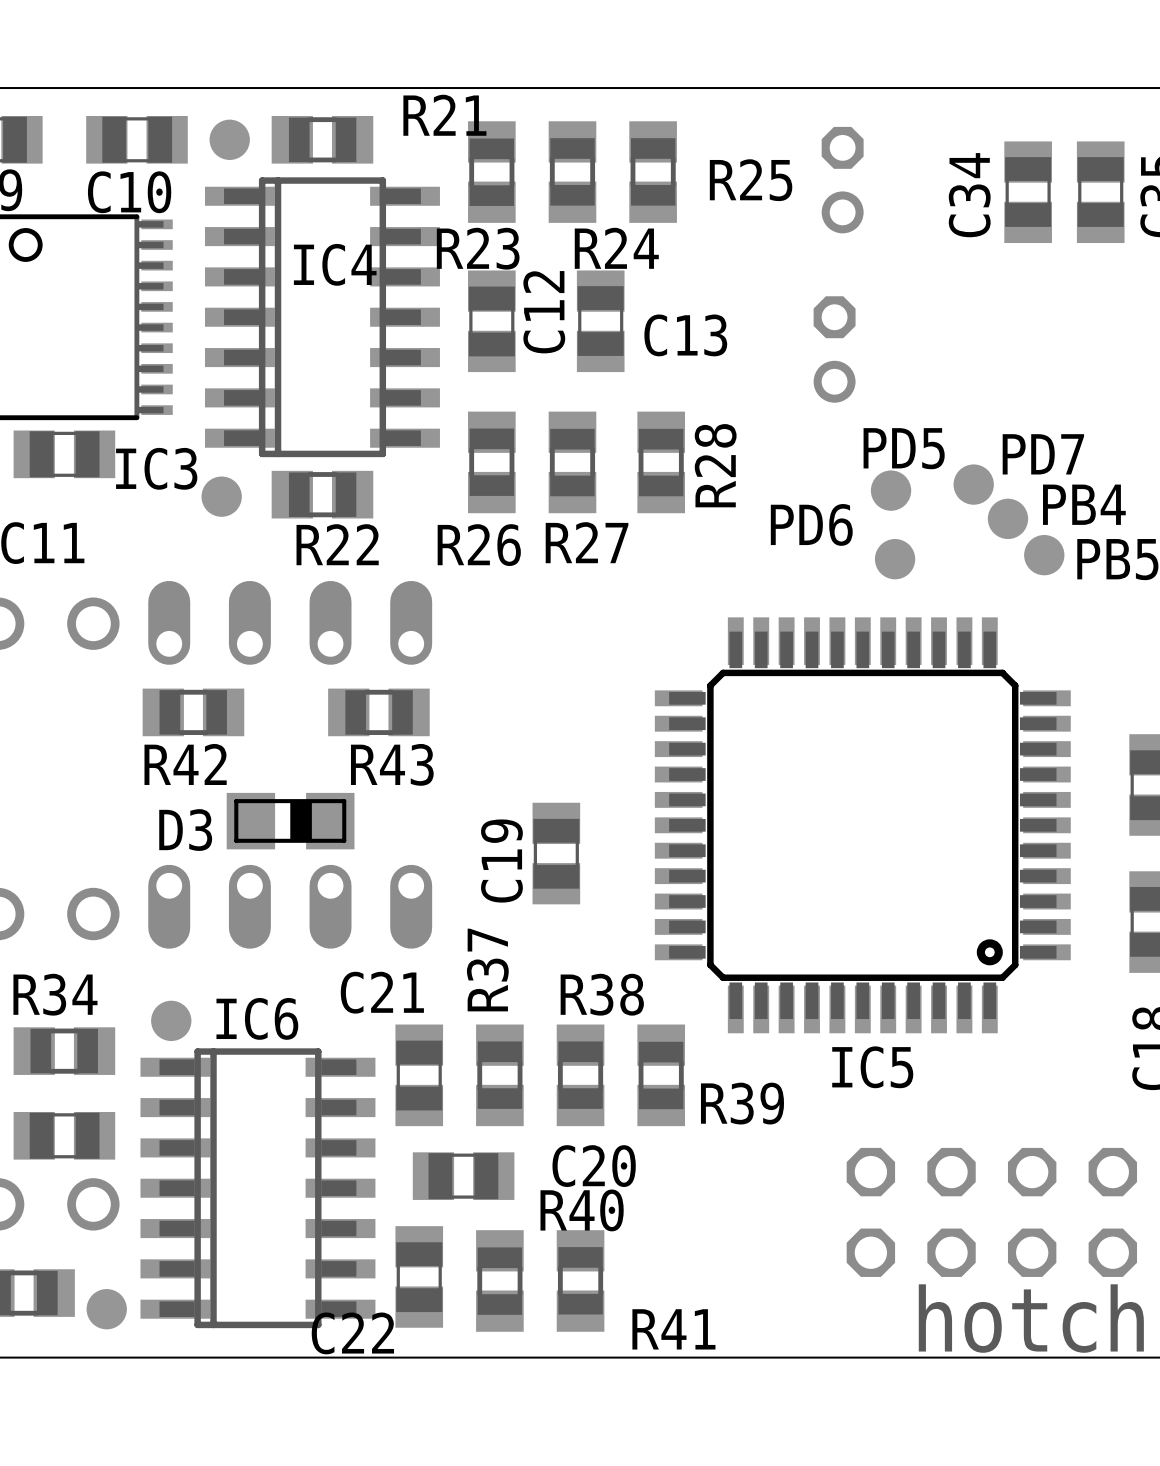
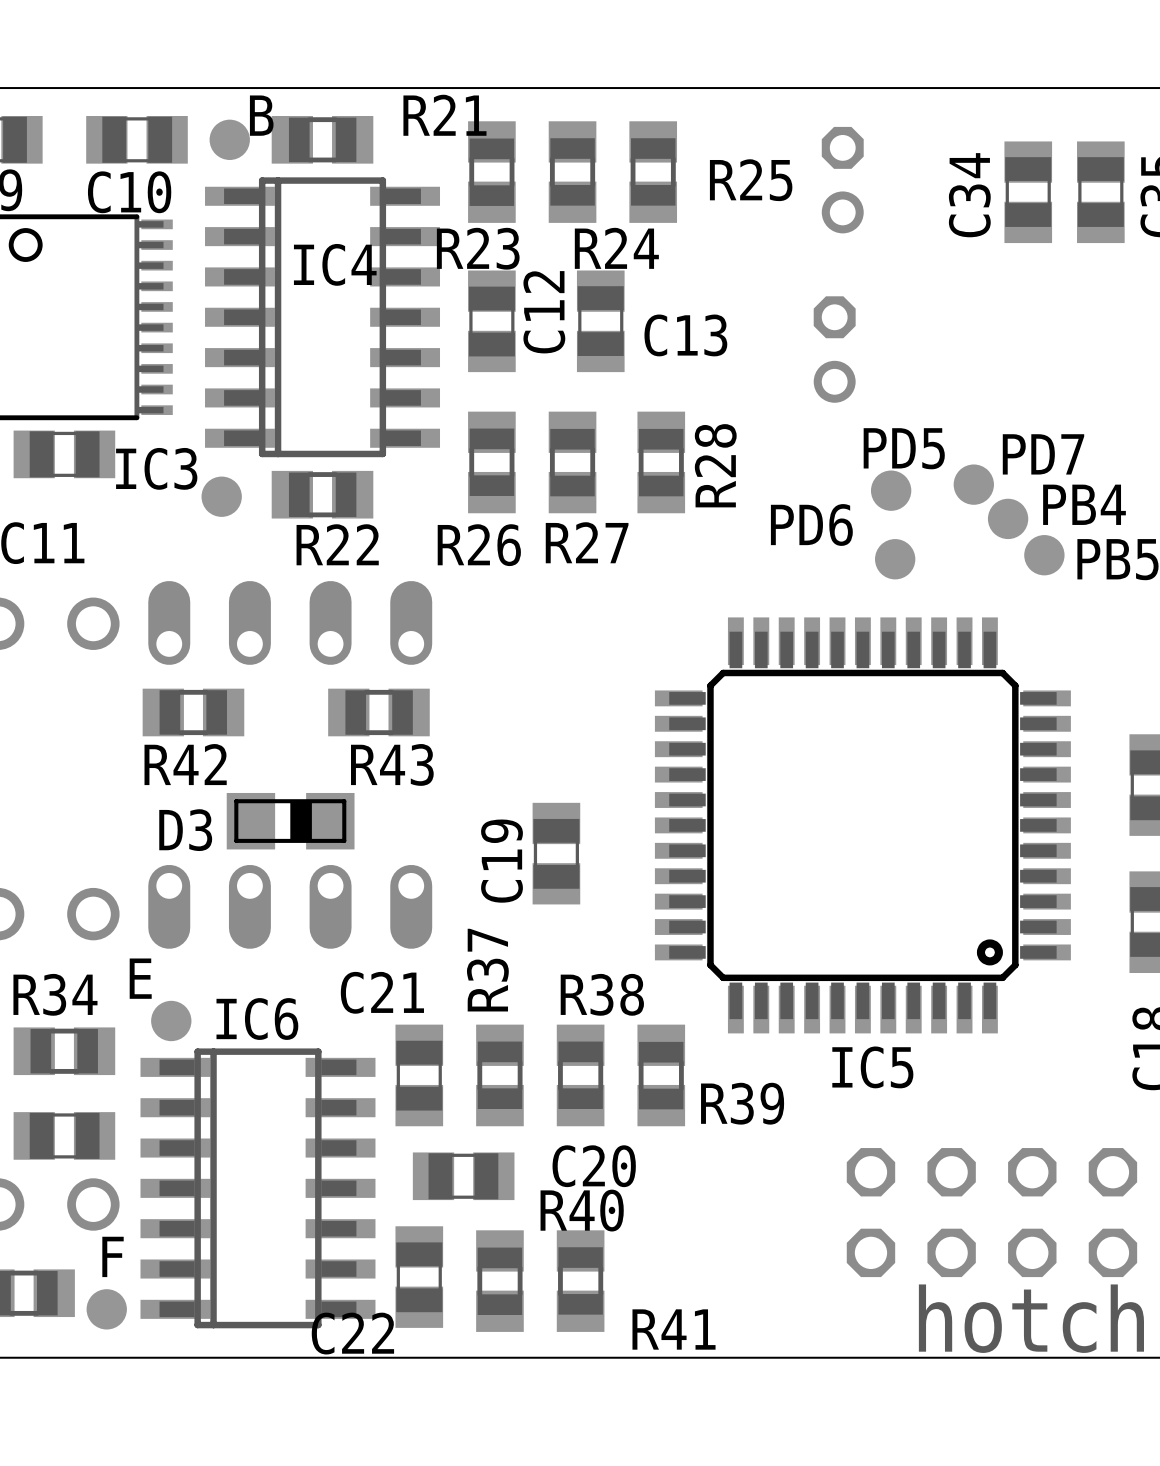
B name: none -> B (261, 115)
E name: none -> E (140, 978)
F name: none -> F (113, 1256)

